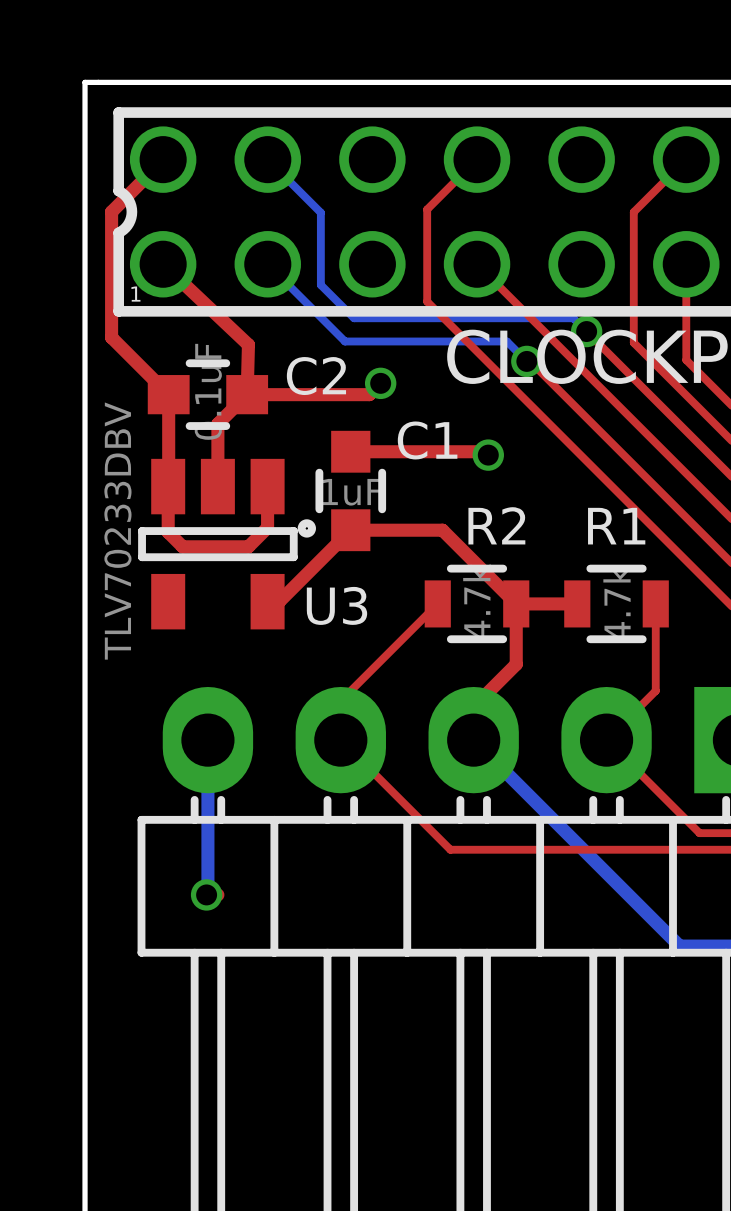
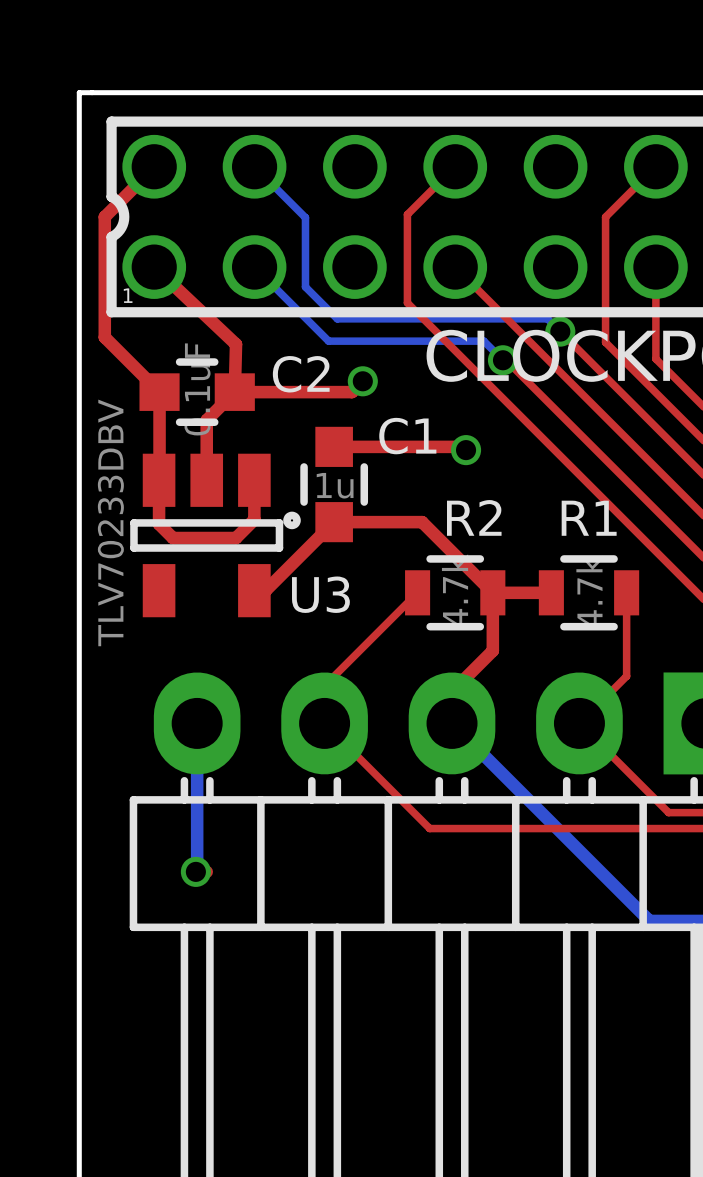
C1 value: 1uF (352, 492) -> 1u (335, 485)

